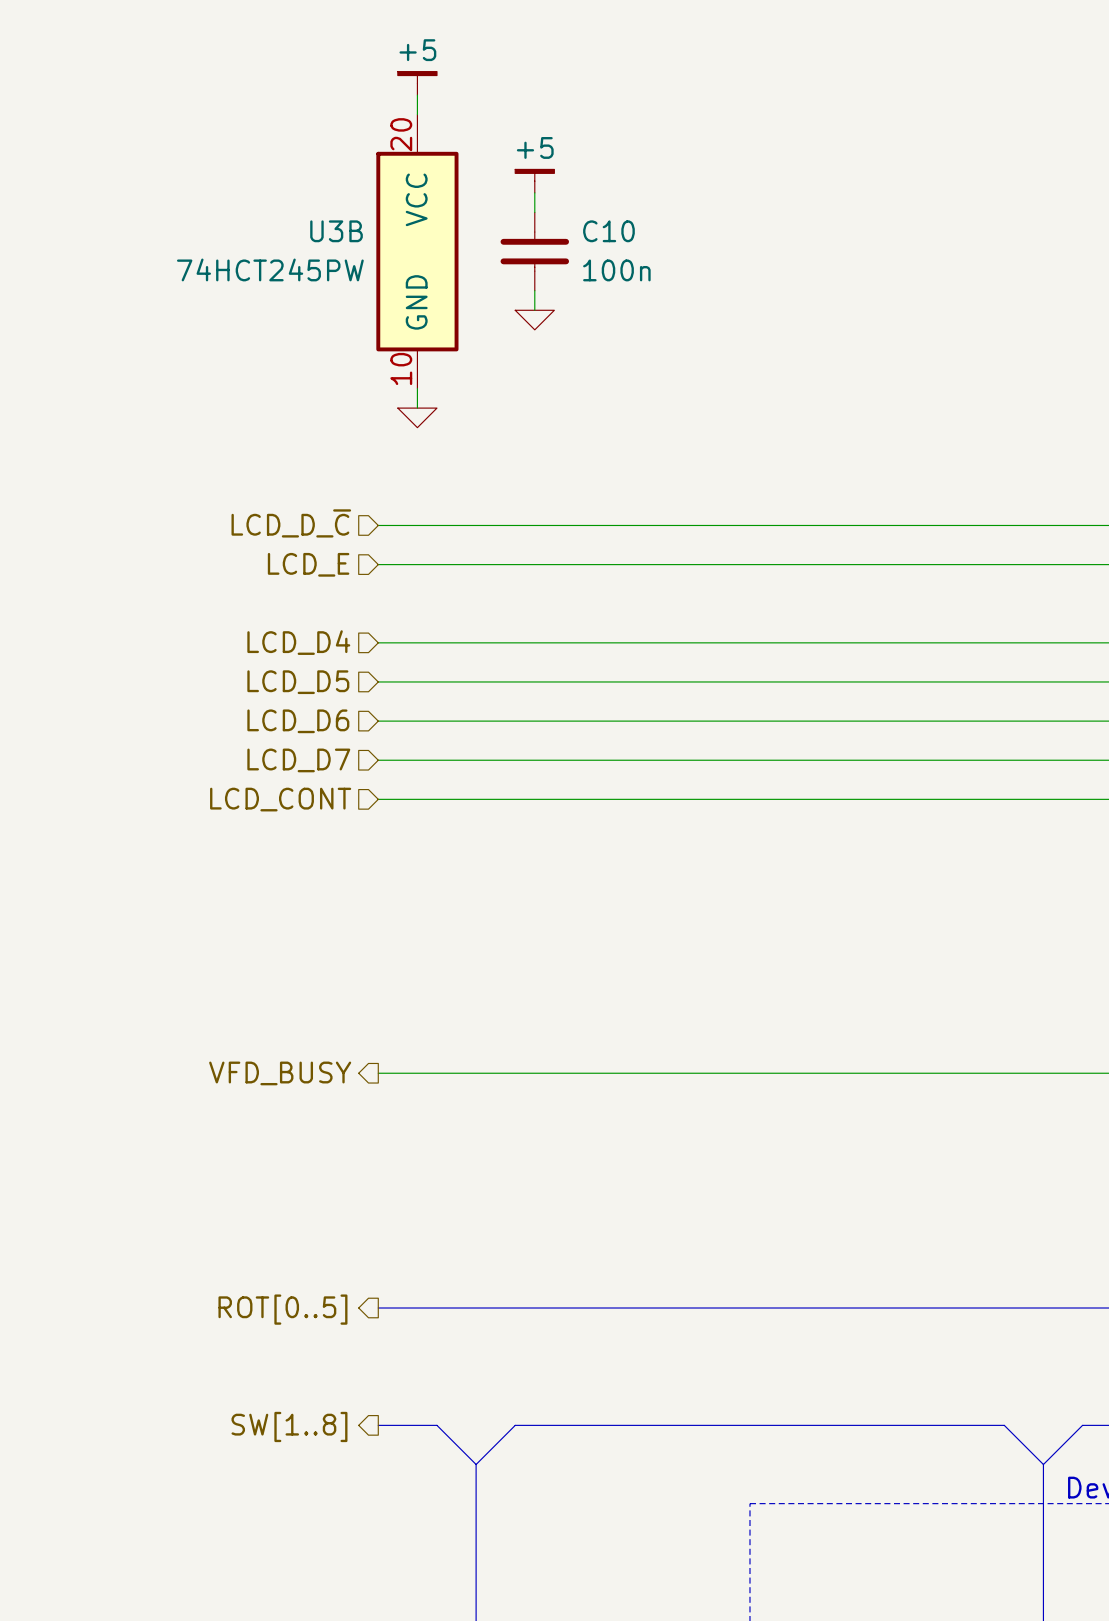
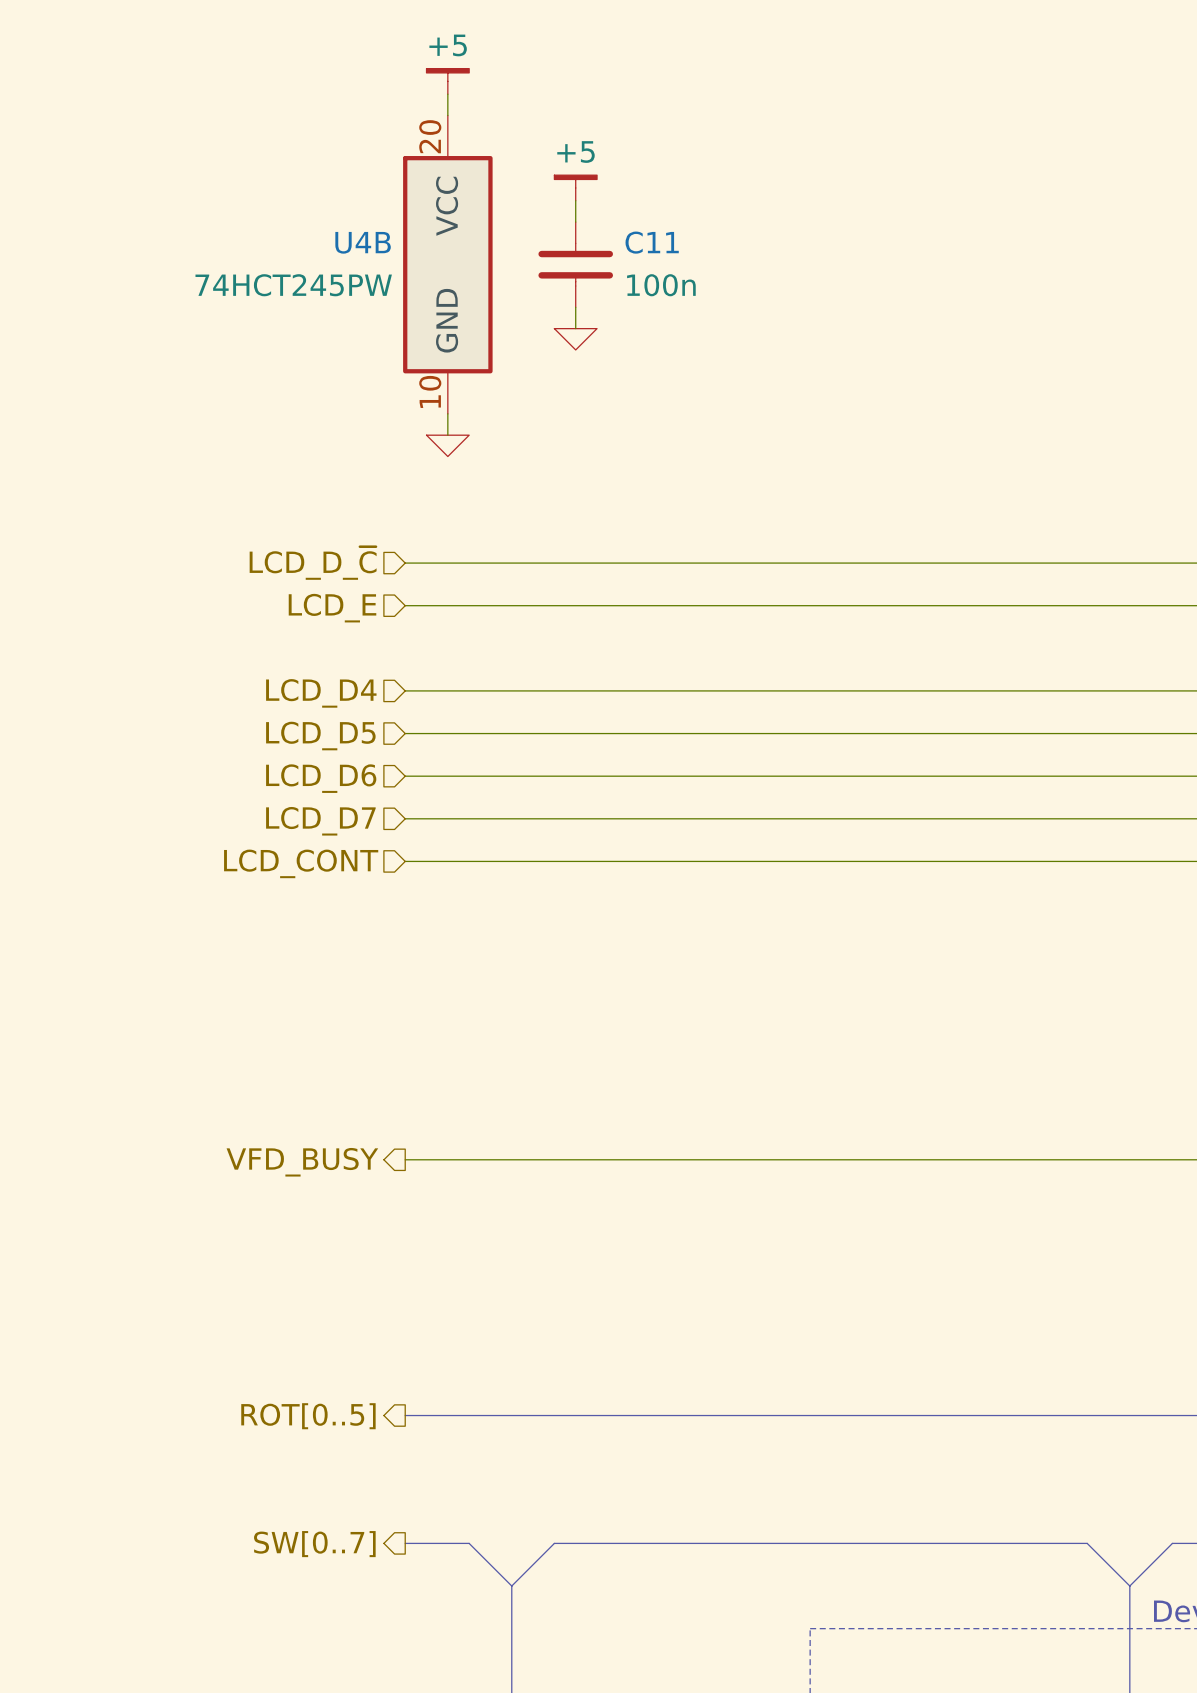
U3B name: U3B (336, 231) -> U4B (363, 242)
C10 name: C10 (608, 231) -> C11 (652, 242)
hierarchical label: SW[1..8] (289, 1426) -> SW[0..7] (314, 1544)

